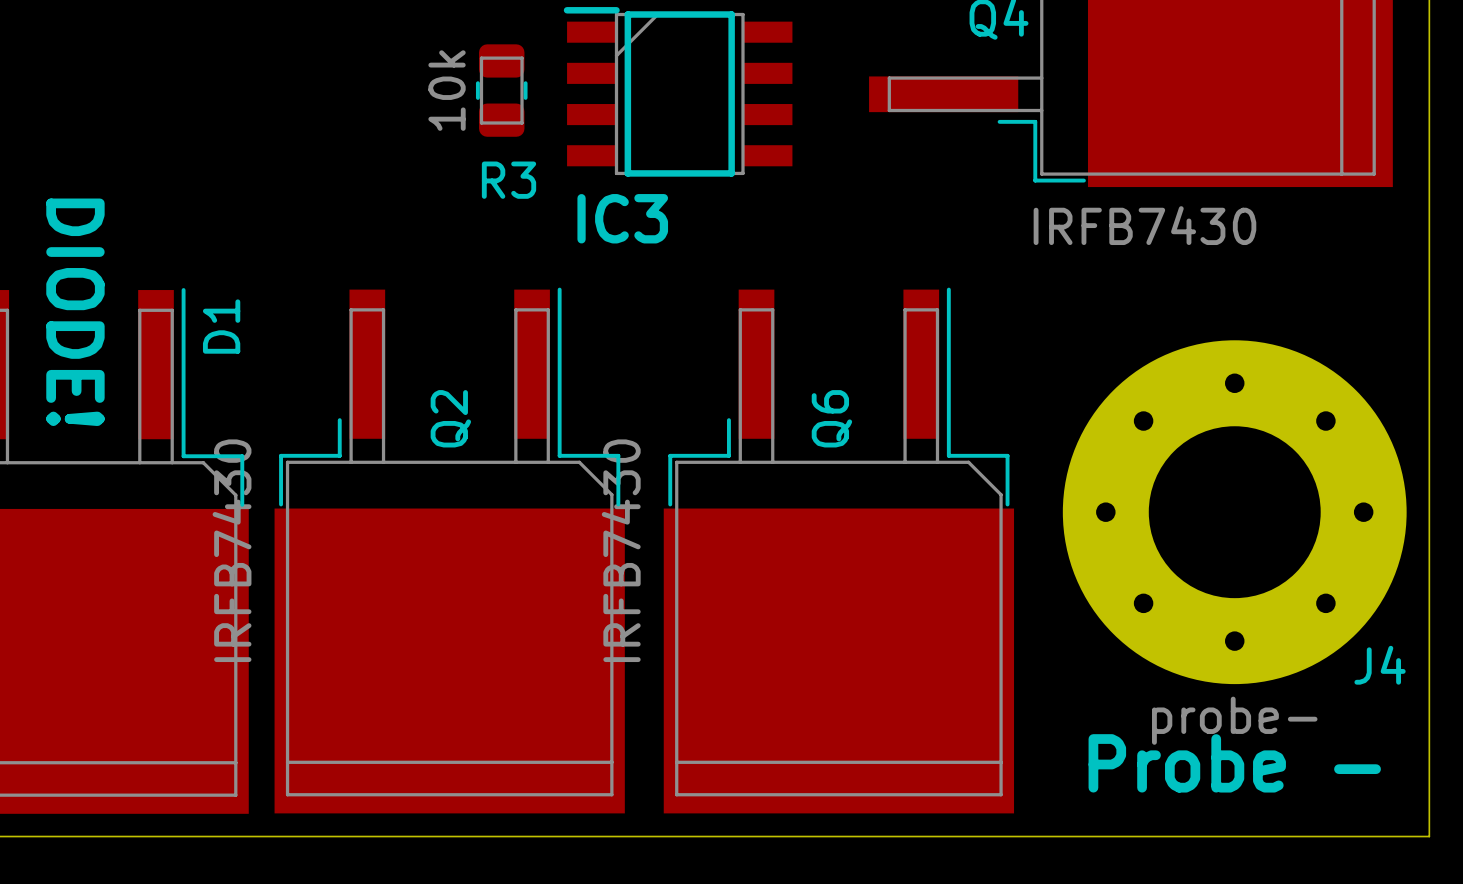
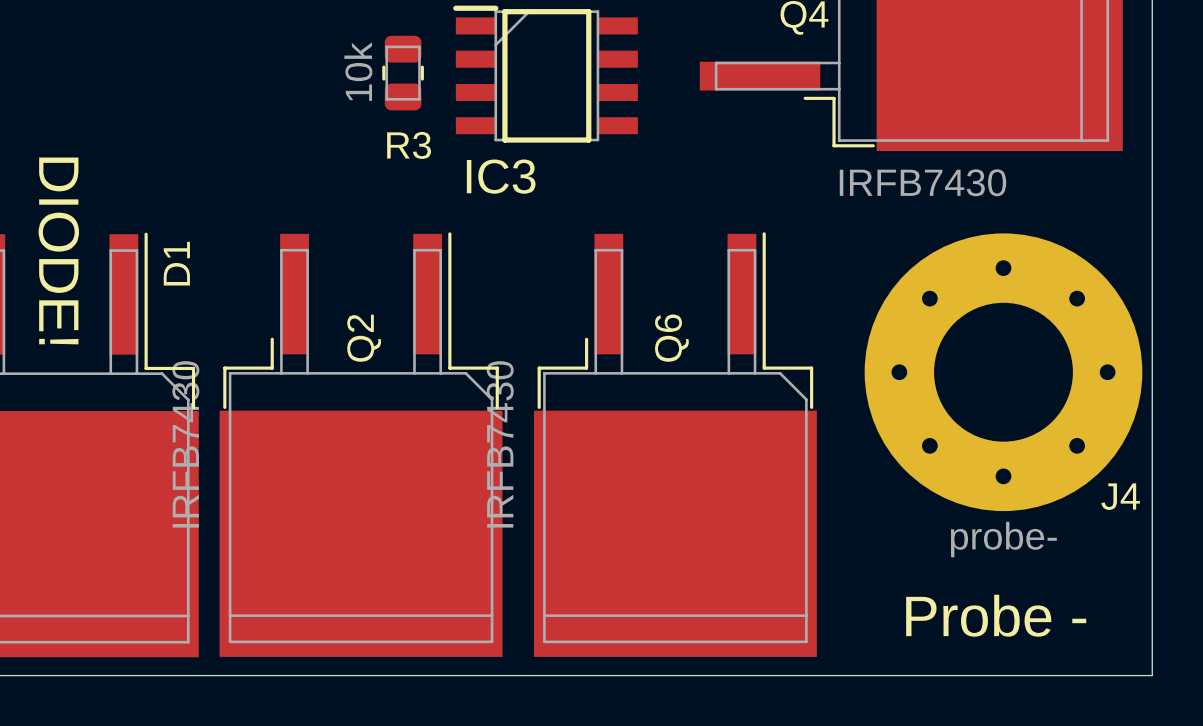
J4 position: (1234, 512) -> (1003, 372)

